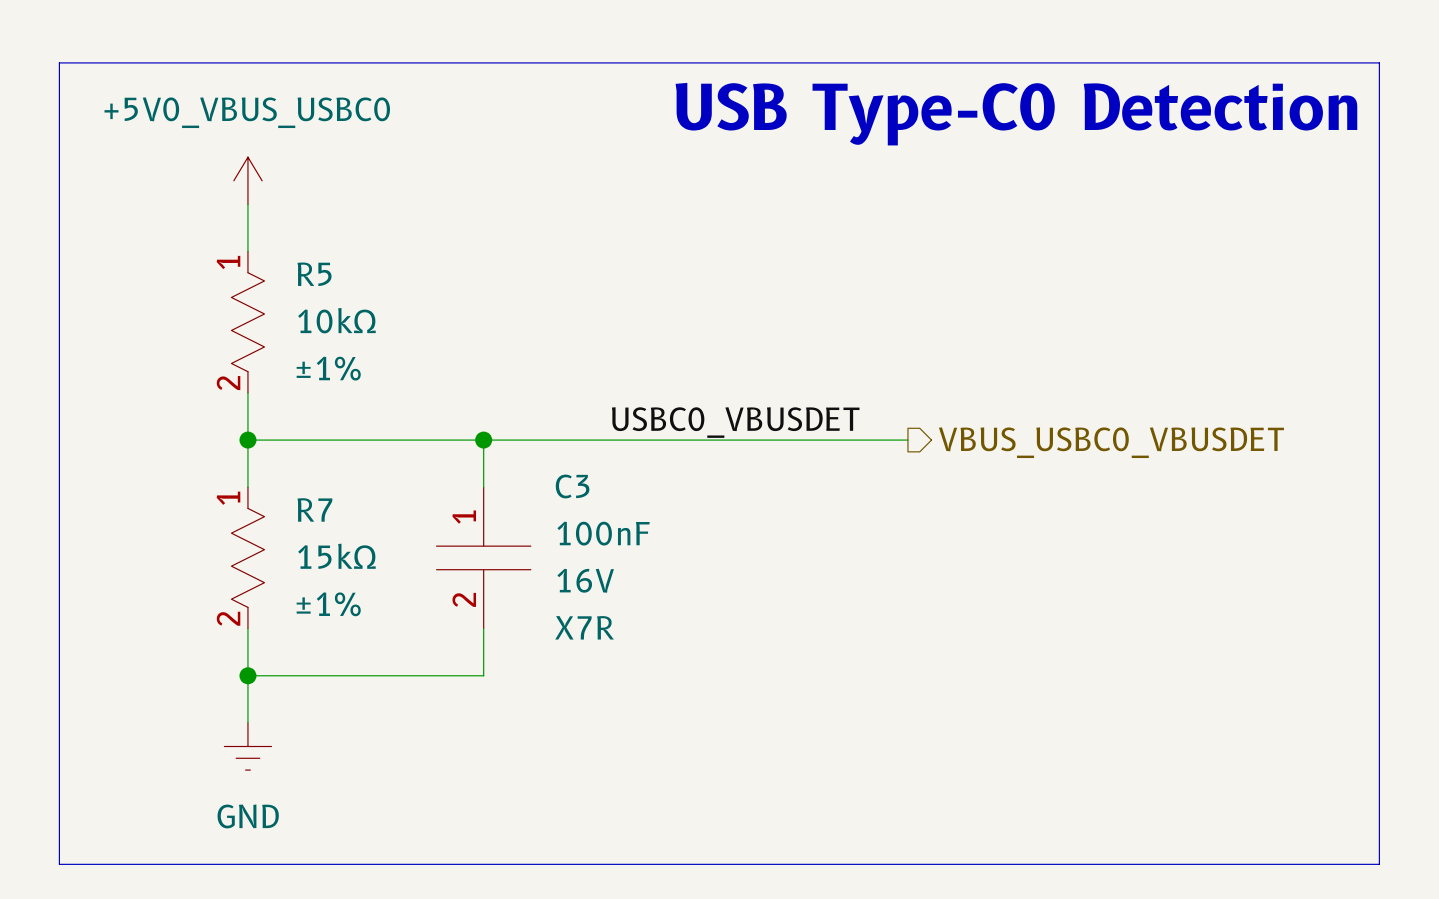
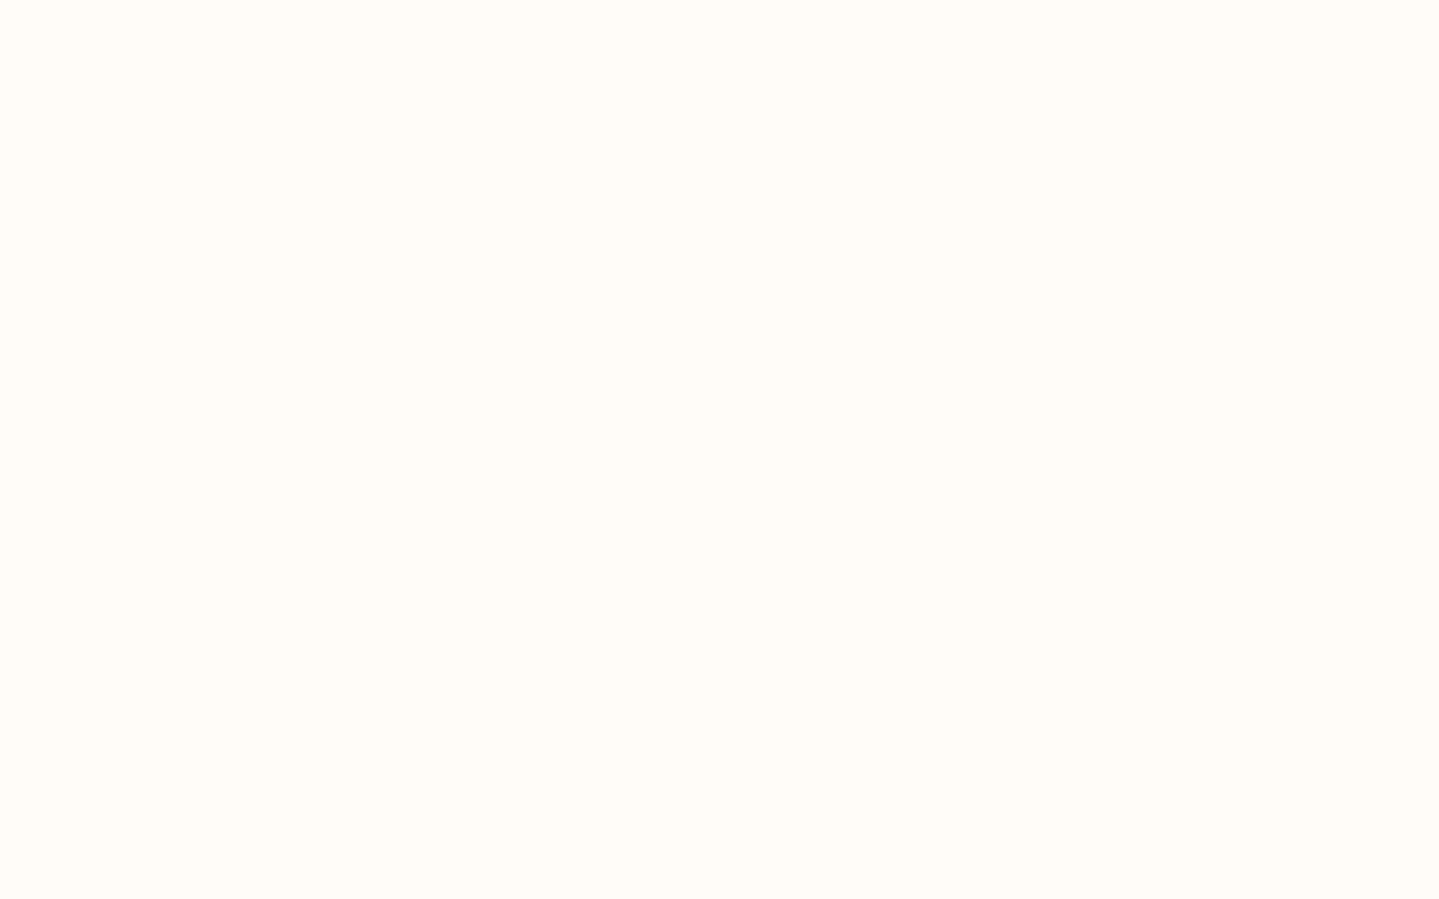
line: (59, 62) (1379, 62) (1379, 864) (59, 864) (59, 62) -> none
text: USB Type-C0 Detection (1016, 114) -> none
power symbol: +5V0_VBUS_USBC0 (247, 180) -> none
wire: (247, 204) (247, 251) -> none
R5: (247, 322) -> none
wire: (247, 392) (247, 487) -> none
label: USBC0_VBUSDET (735, 422) -> none
wire: (247, 440) (907, 440) -> none
junction: (247, 440) -> none
wire: (483, 440) (483, 487) -> none
junction: (483, 440) -> none
hierarchical label: VBUS_USBC0_VBUSDET (1111, 442) -> none
R7: (247, 557) -> none
C3: (483, 557) -> none
wire: (247, 628) (247, 722) -> none
wire: (483, 628) (483, 675) (247, 675) -> none
junction: (247, 675) -> none
power symbol: GND (247, 746) -> none

